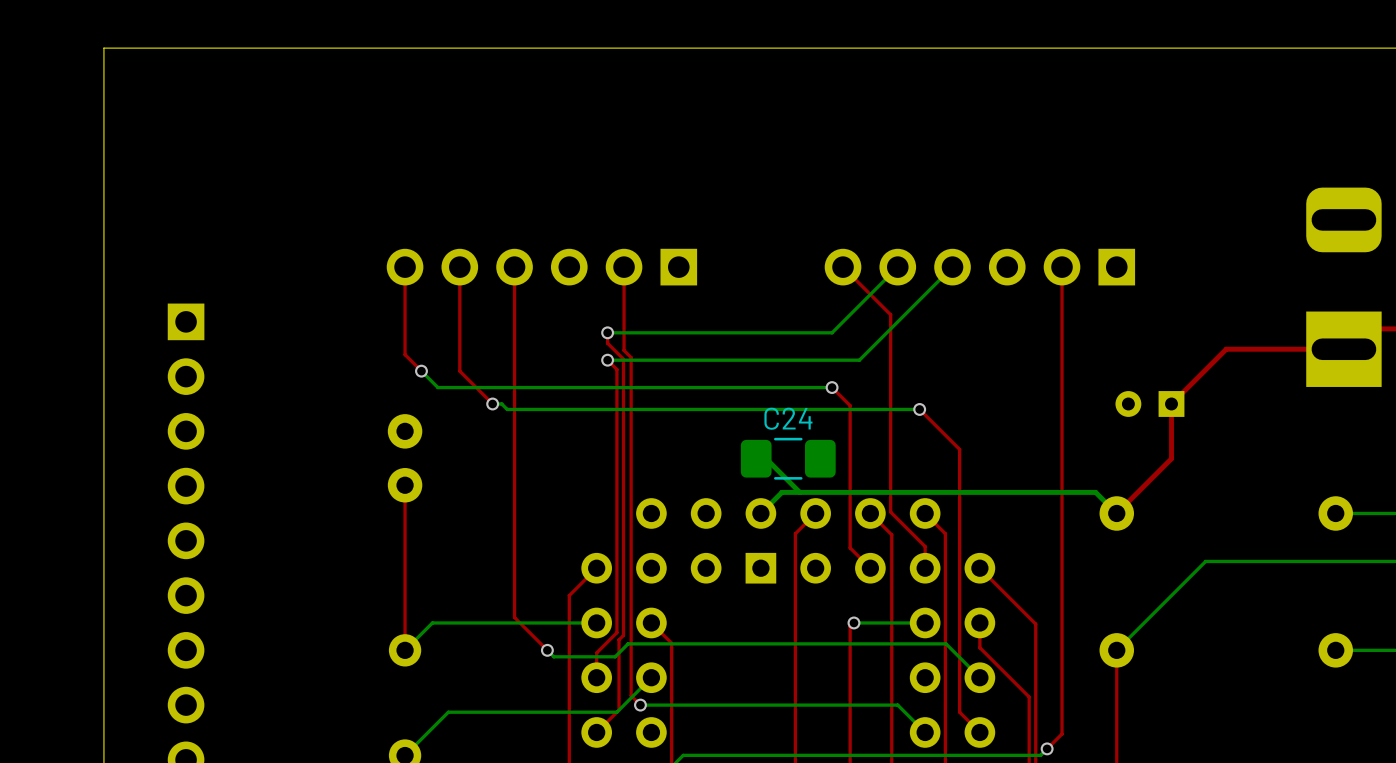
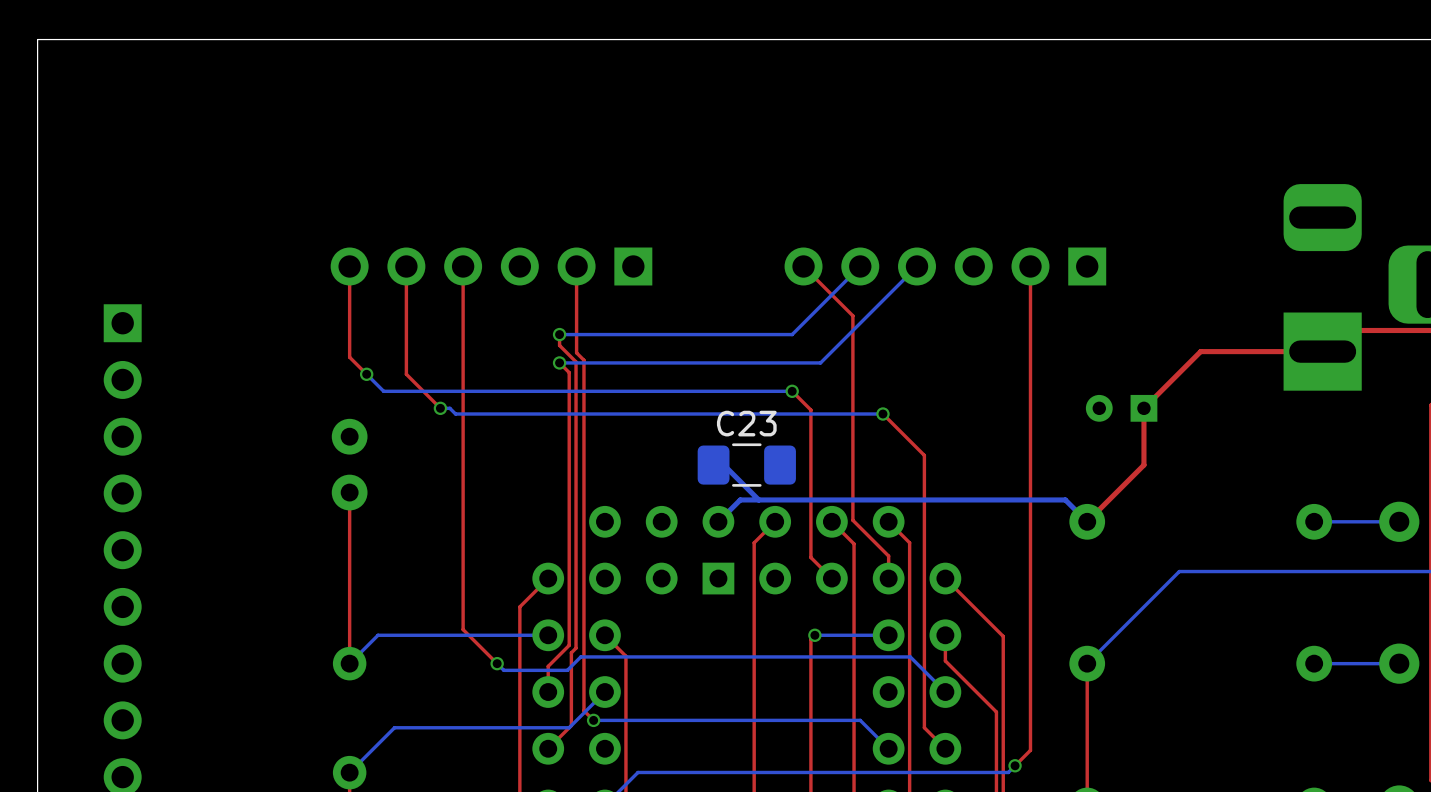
C24 name: C24 (788, 418) -> C23 (746, 423)

